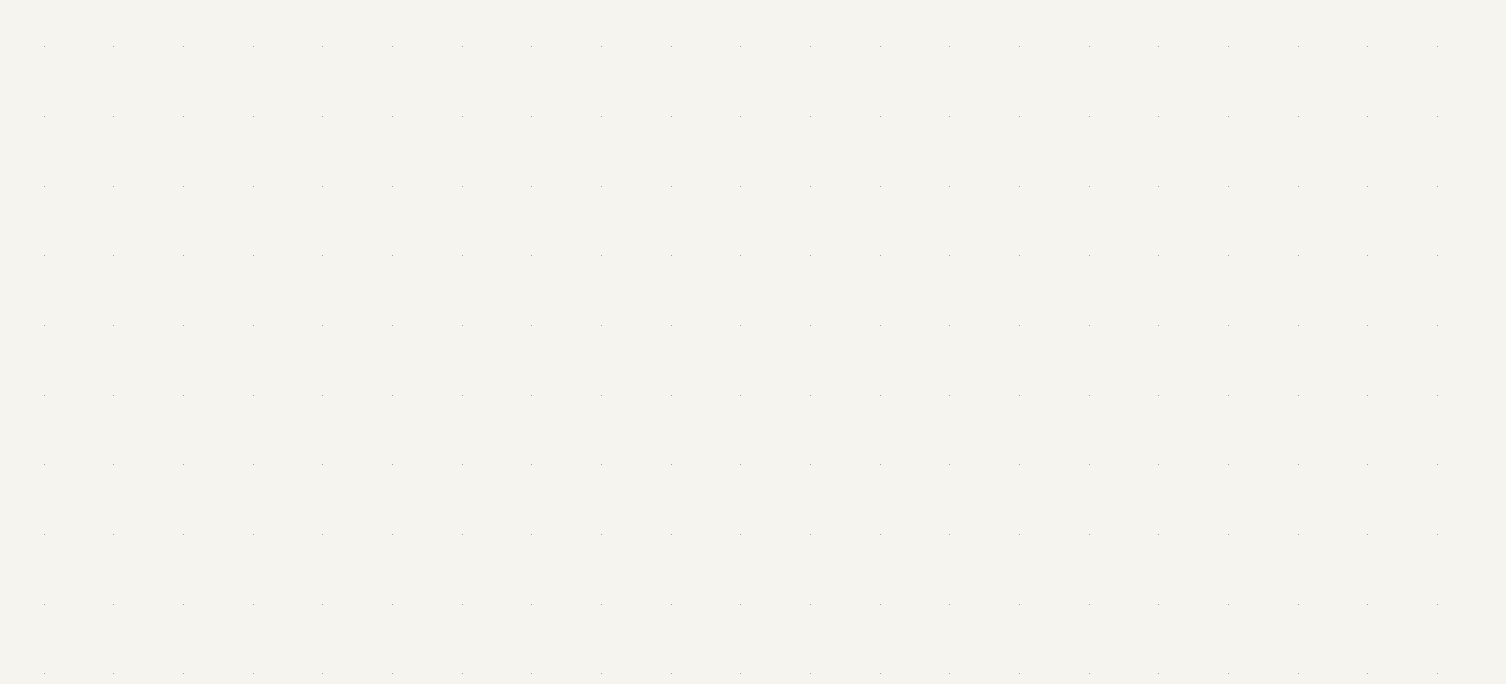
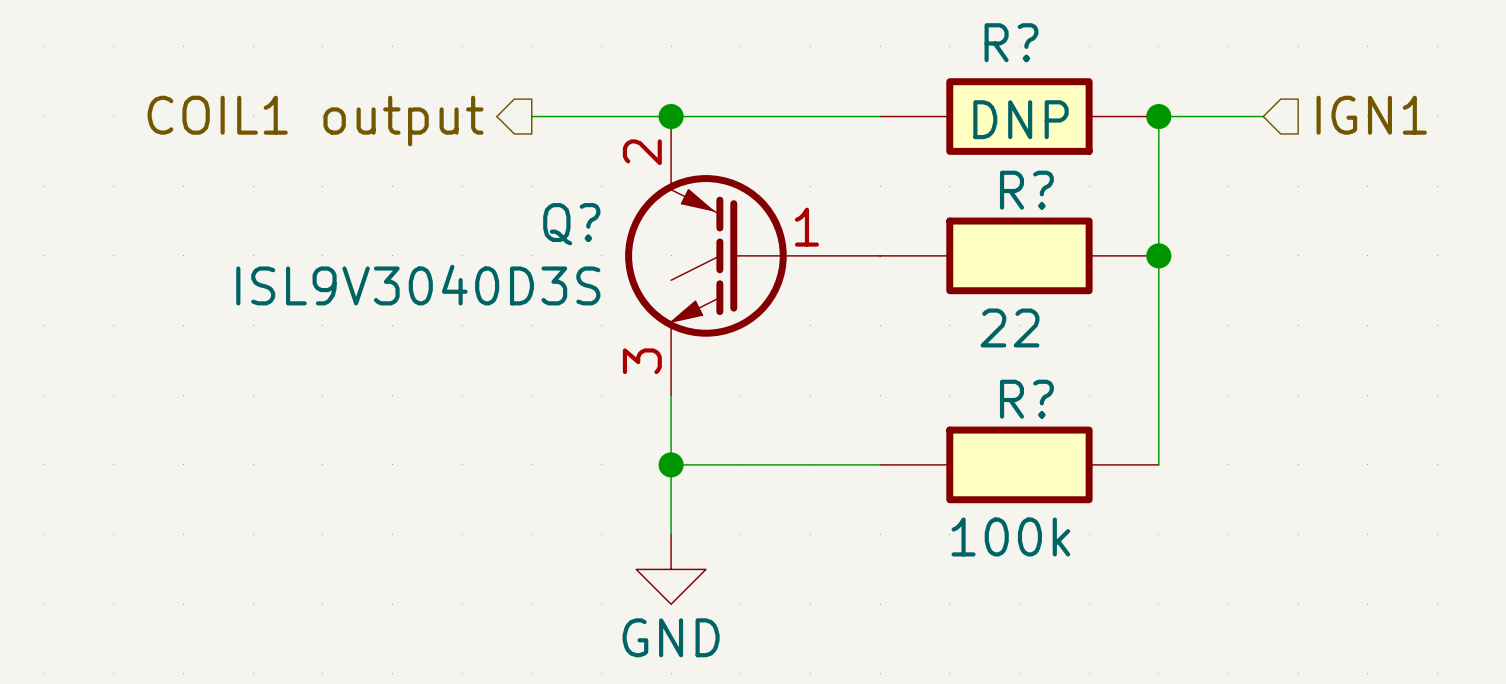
hierarchical label: none -> IGN1 (1371, 115)
wire: none -> (531, 116) (880, 116)
junction: none -> (671, 116)
R?: none -> DNP (1019, 116)
junction: none -> (1158, 116)
wire: none -> (1263, 116) (1158, 116) (1158, 464)
hierarchical label: none -> COIL1 output (315, 121)
Q?: none -> ISL9V3040D3S (752, 255)
R?: none -> 22 (1019, 255)
junction: none -> (1158, 255)
wire: none -> (671, 395) (671, 534)
wire: none -> (671, 464) (880, 464)
junction: none -> (671, 464)
R?: none -> 100k (1019, 464)
power symbol: none -> GND (671, 569)

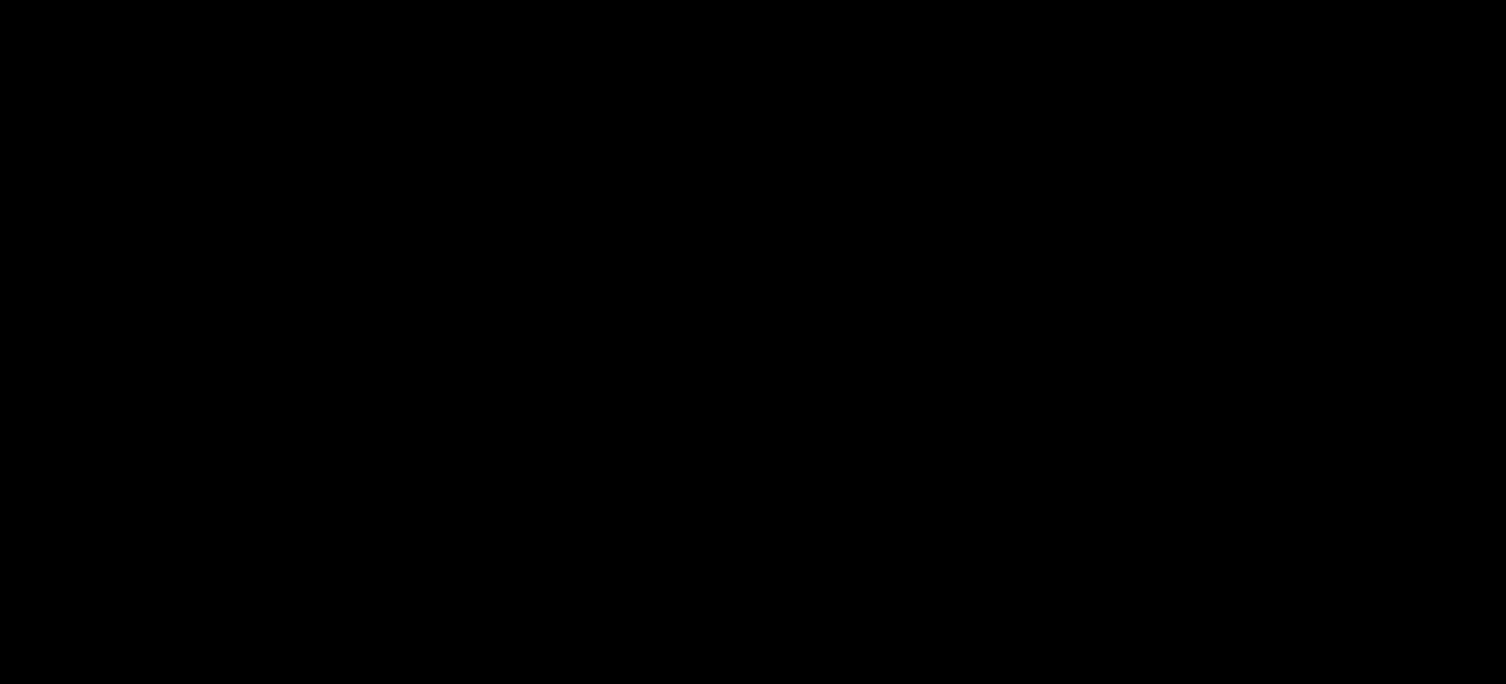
hierarchical label: IGN1 (1371, 115) -> none
wire: (531, 116) (880, 116) -> none
junction: (671, 116) -> none
R?: DNP (1019, 116) -> none
junction: (1158, 116) -> none
wire: (1263, 116) (1158, 116) (1158, 464) -> none
hierarchical label: COIL1 output (315, 121) -> none
Q?: ISL9V3040D3S (752, 255) -> none
R?: 22 (1019, 255) -> none
junction: (1158, 255) -> none
wire: (671, 395) (671, 534) -> none
wire: (671, 464) (880, 464) -> none
junction: (671, 464) -> none
R?: 100k (1019, 464) -> none
power symbol: GND (671, 569) -> none

